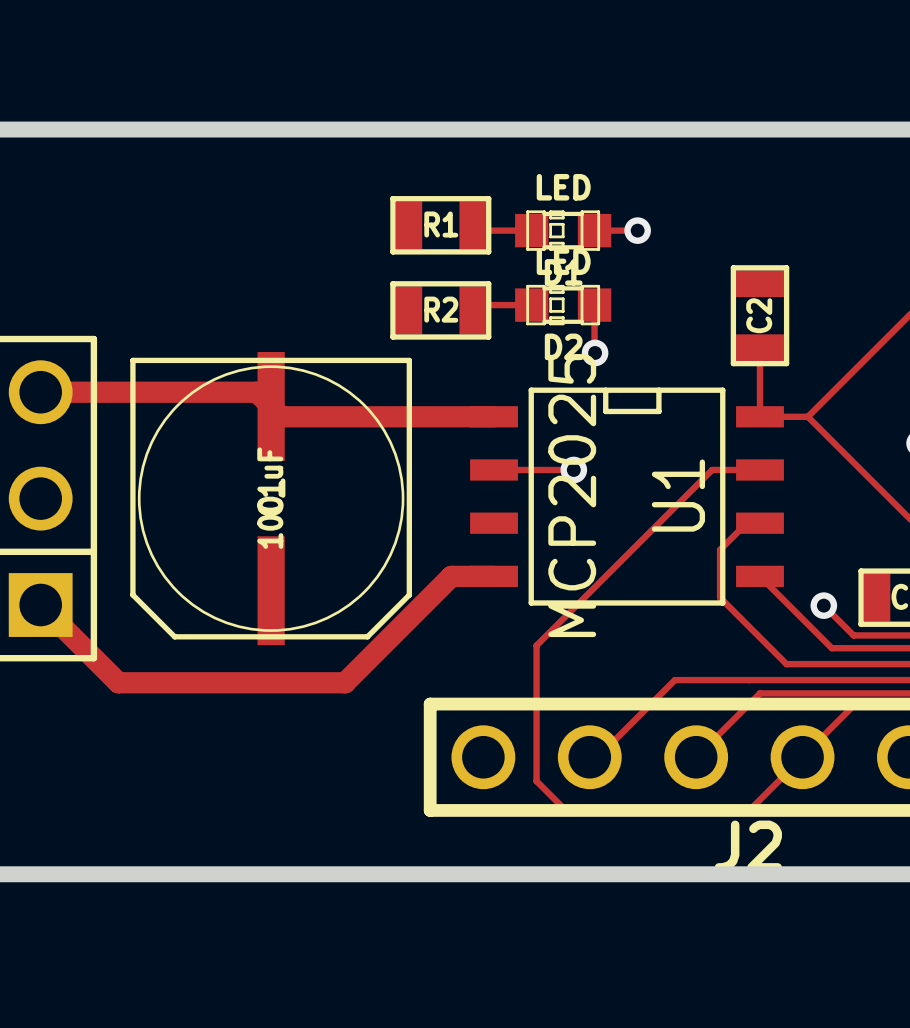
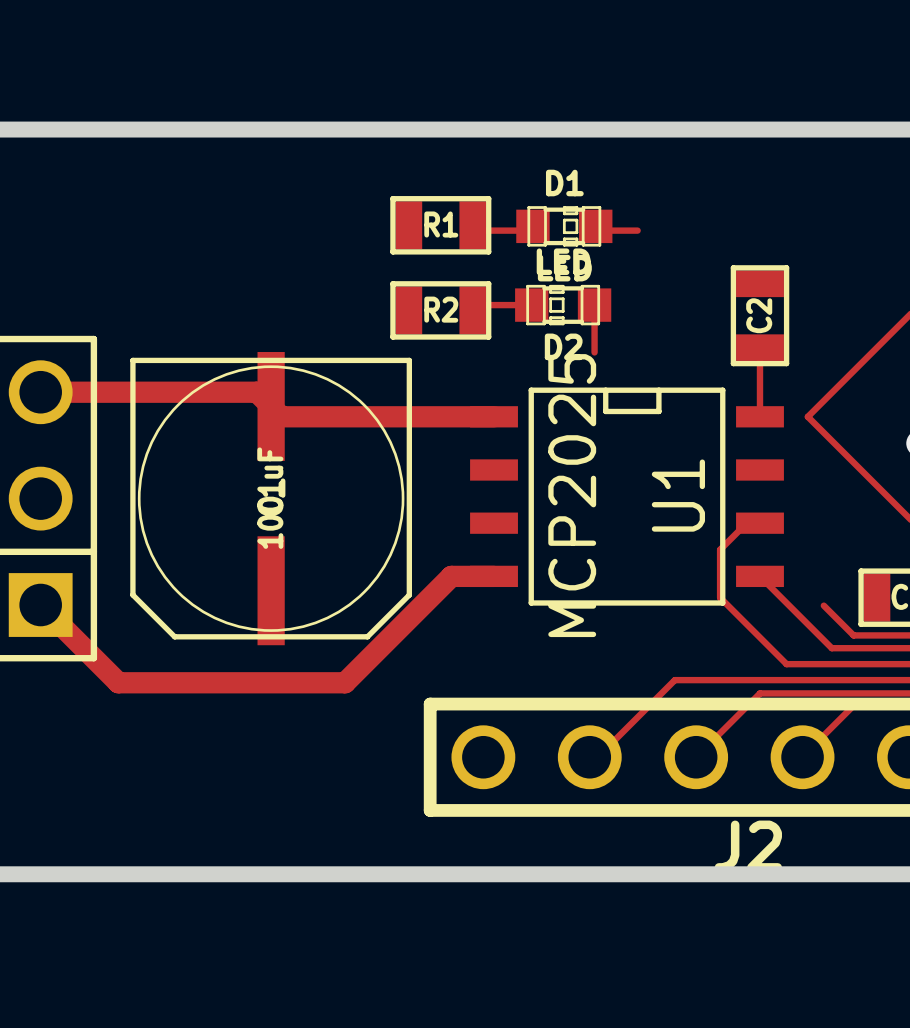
D1 rotation: 0° (563, 230) -> 180° (564, 226)
via: (637, 230) -> none
via: (595, 352) -> none
track: (759, 416) (807, 416) -> none
track: (494, 469) (573, 469) -> none
via: (573, 469) -> none
track: (759, 469) (712, 469) (536, 645) (536, 781) (565, 810) (749, 810) (802, 757) -> none
via: (823, 605) -> none

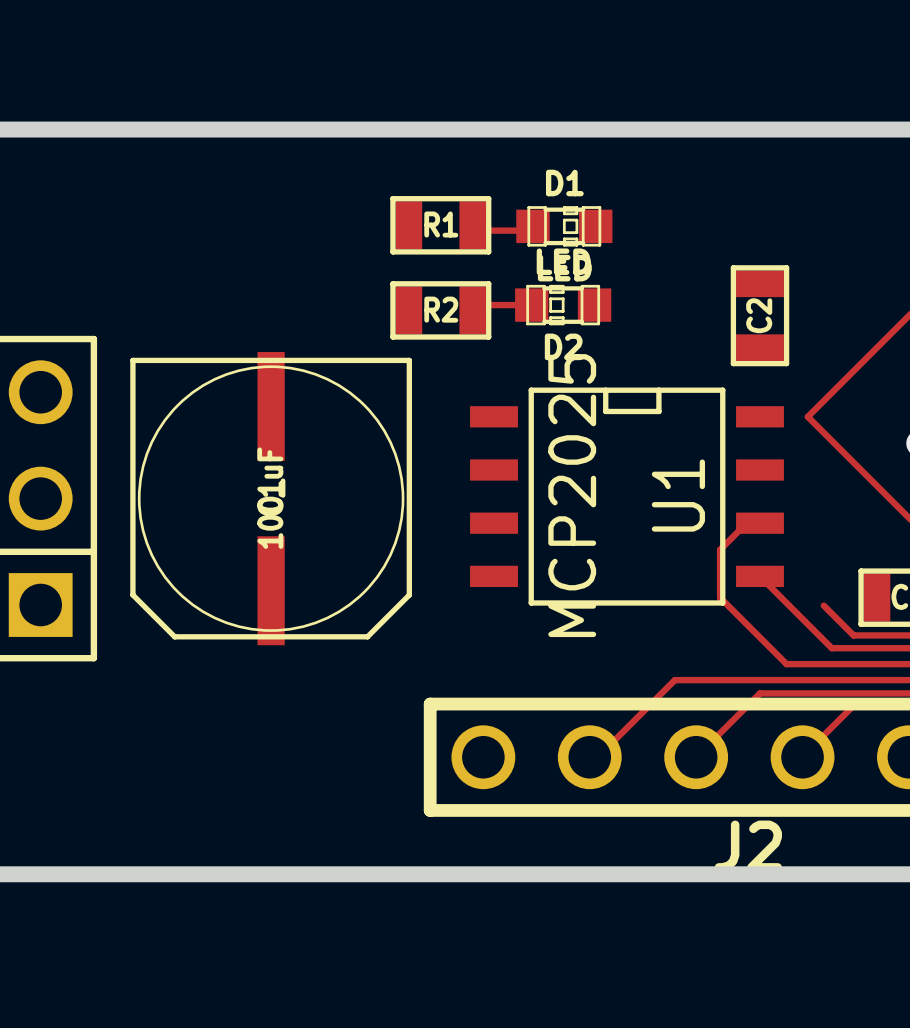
track: (594, 230) (637, 230) -> none
track: (594, 305) (594, 352) -> none
track: (759, 347) (759, 416) -> none
track: (40, 392) (256, 392) (281, 416) (494, 416) -> none
track: (494, 576) (451, 576) (345, 682) (118, 682) (40, 605) -> none

